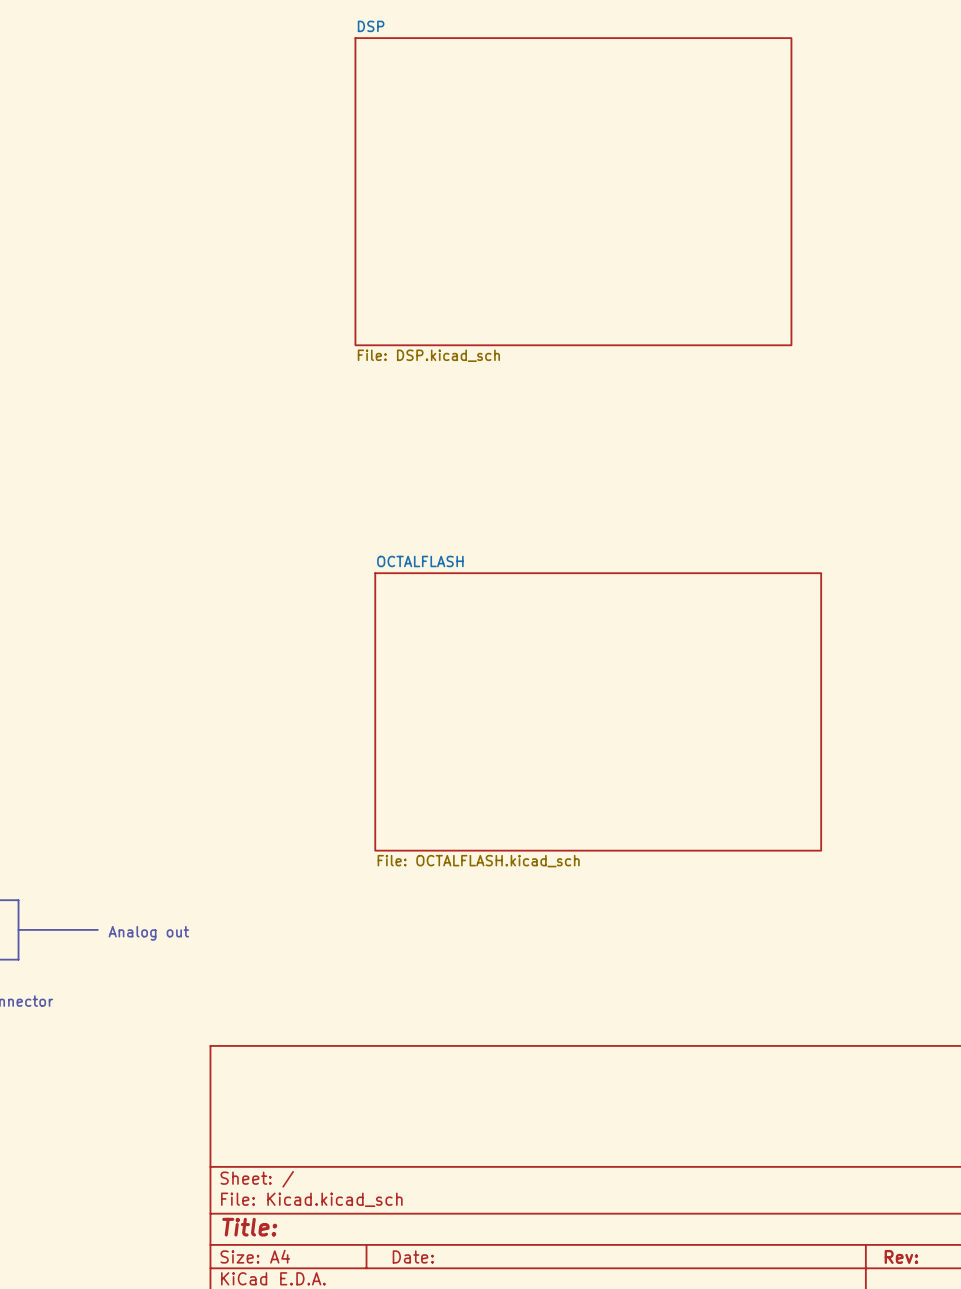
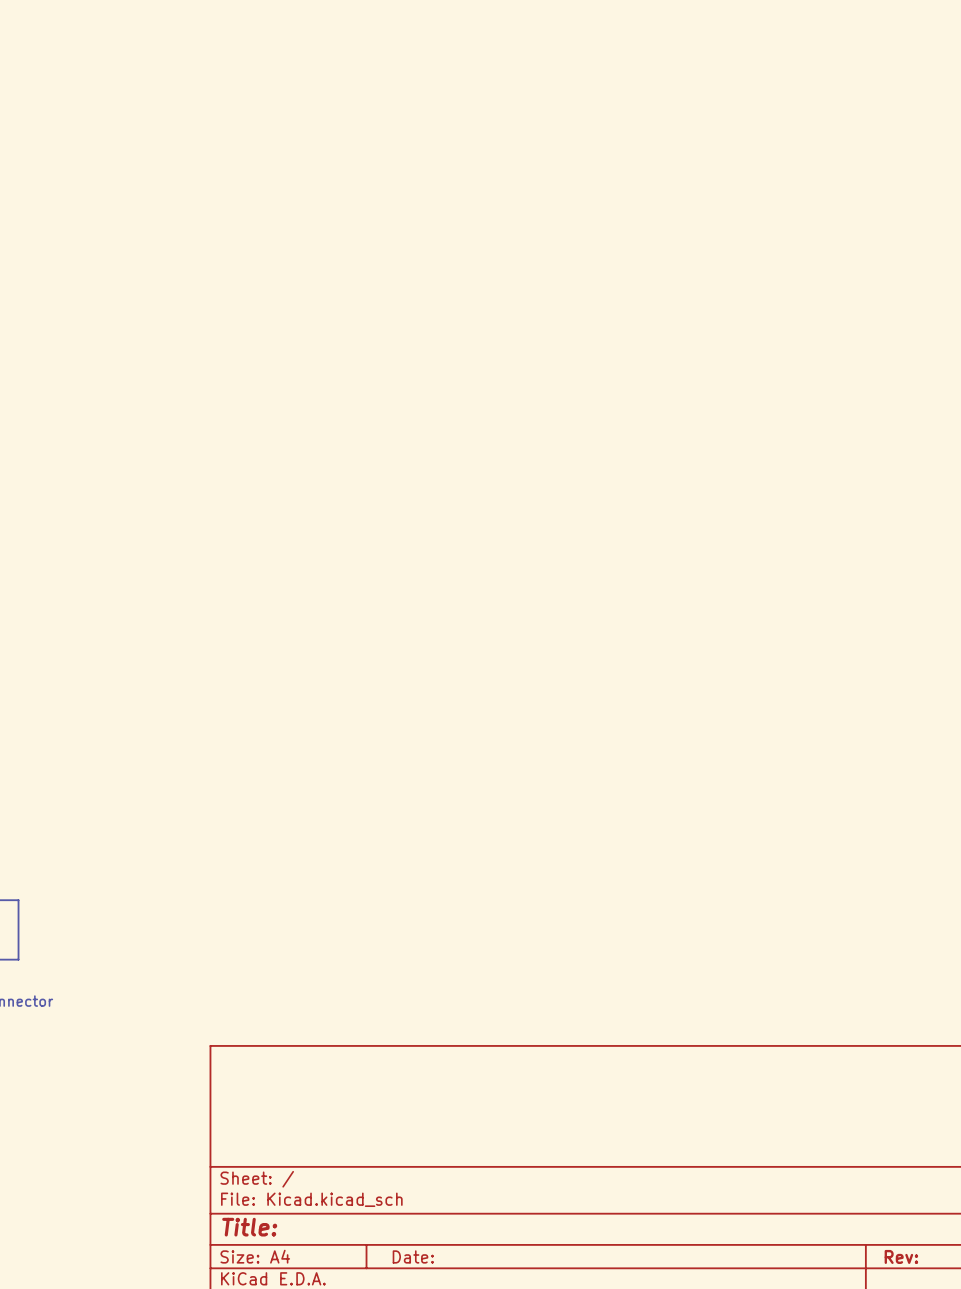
sheet DSP: File: DSP.kicad_sch (573, 191) -> none
sheet OCTALFLASH: File: OCTALFLASH.kicad_sch (598, 711) -> none
line: (18, 929) (97, 929) -> none
text: Analog out (148, 933) -> none

